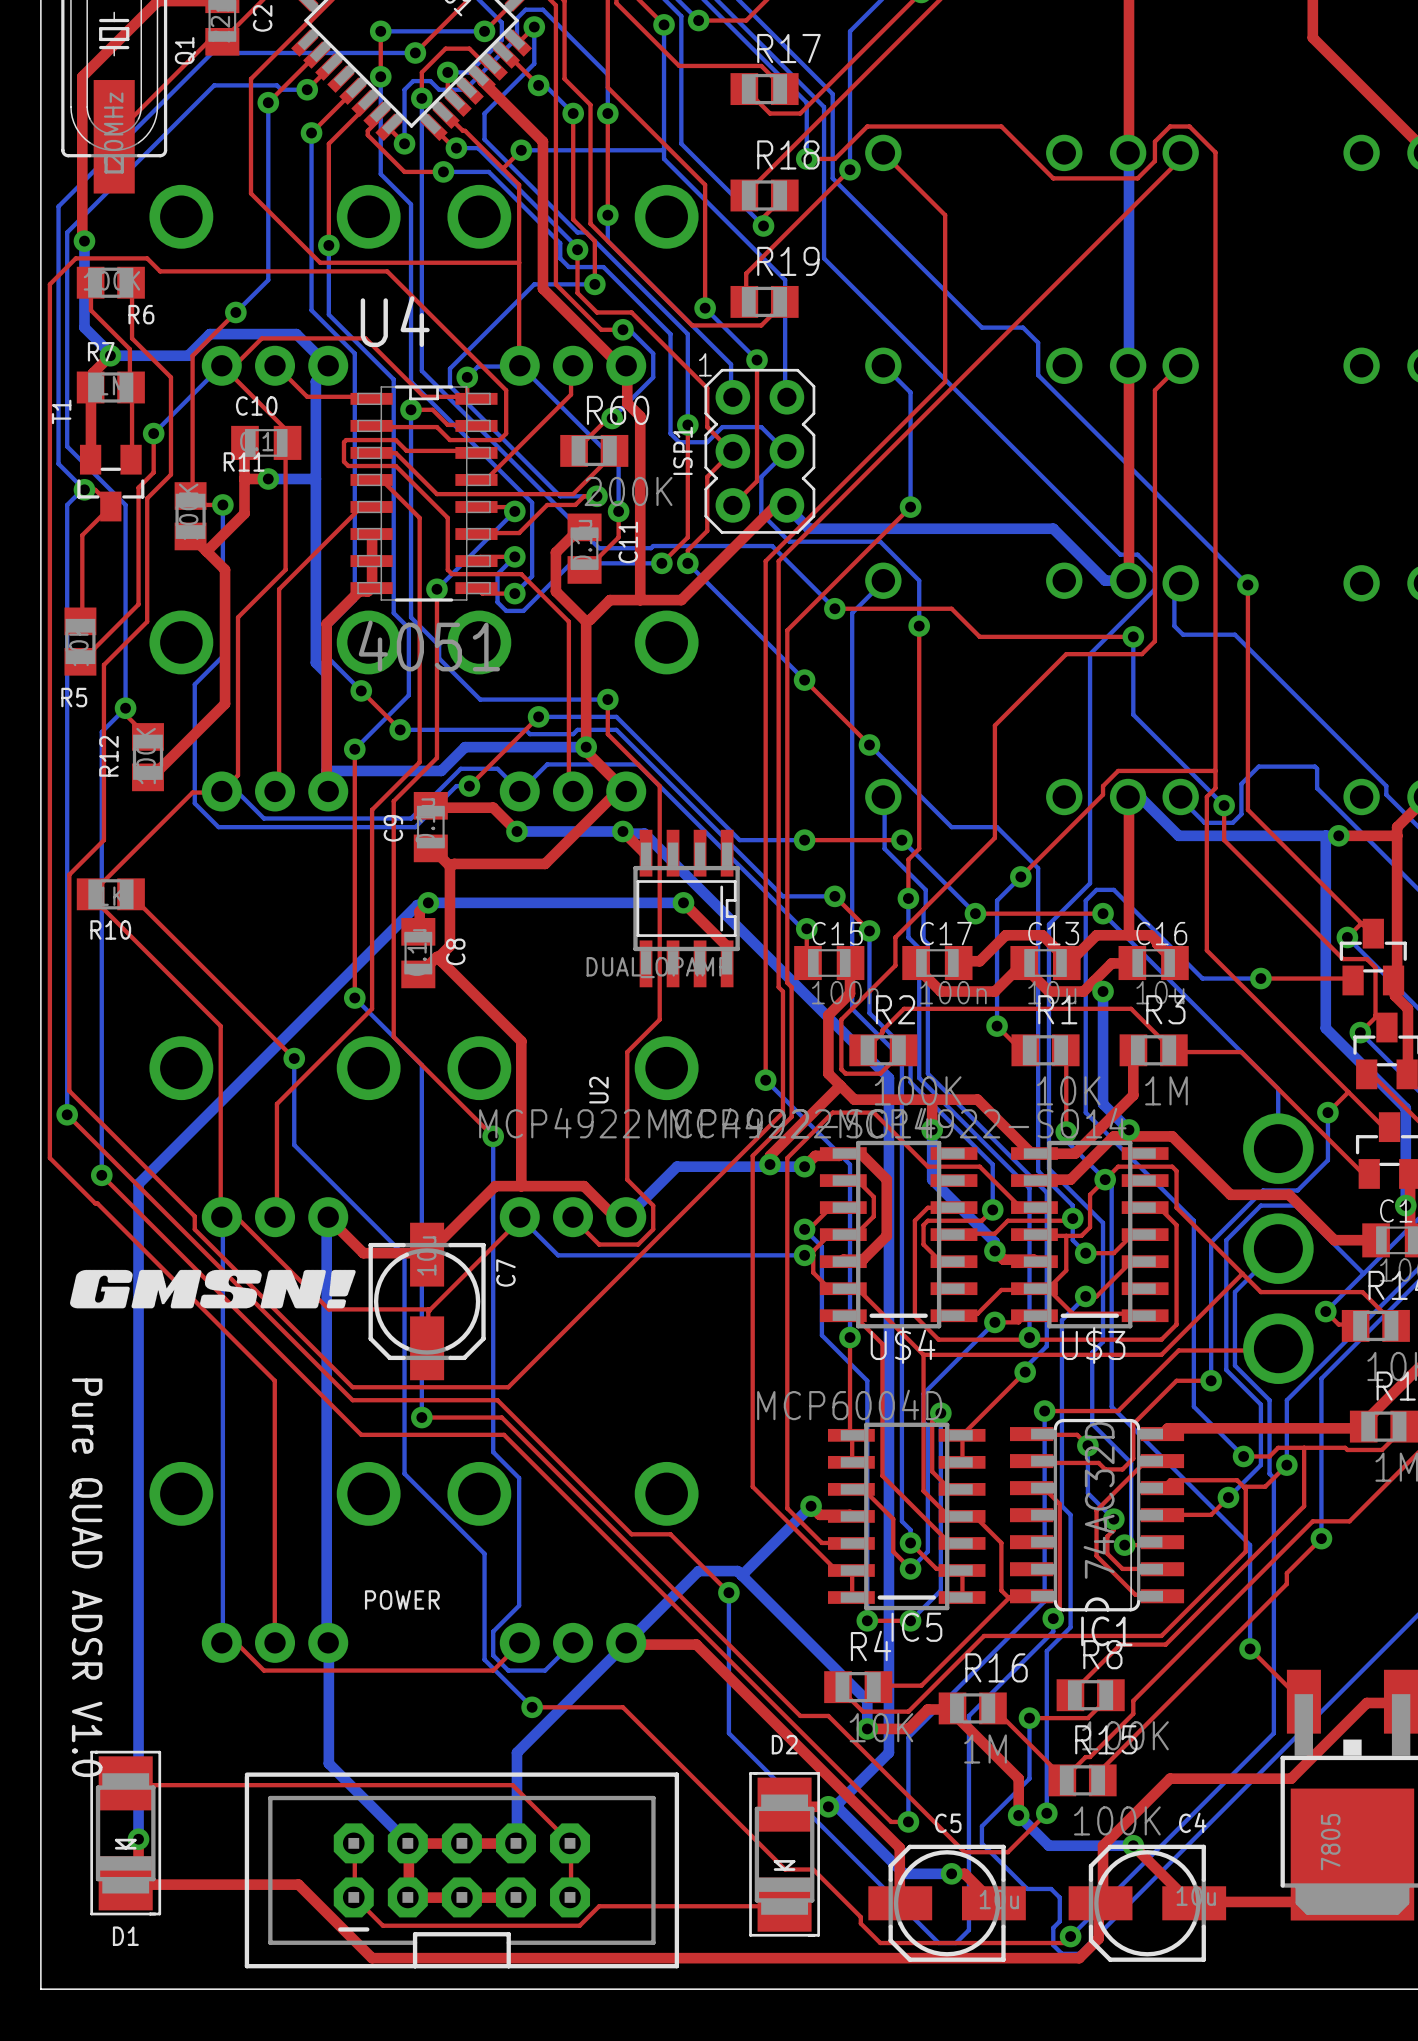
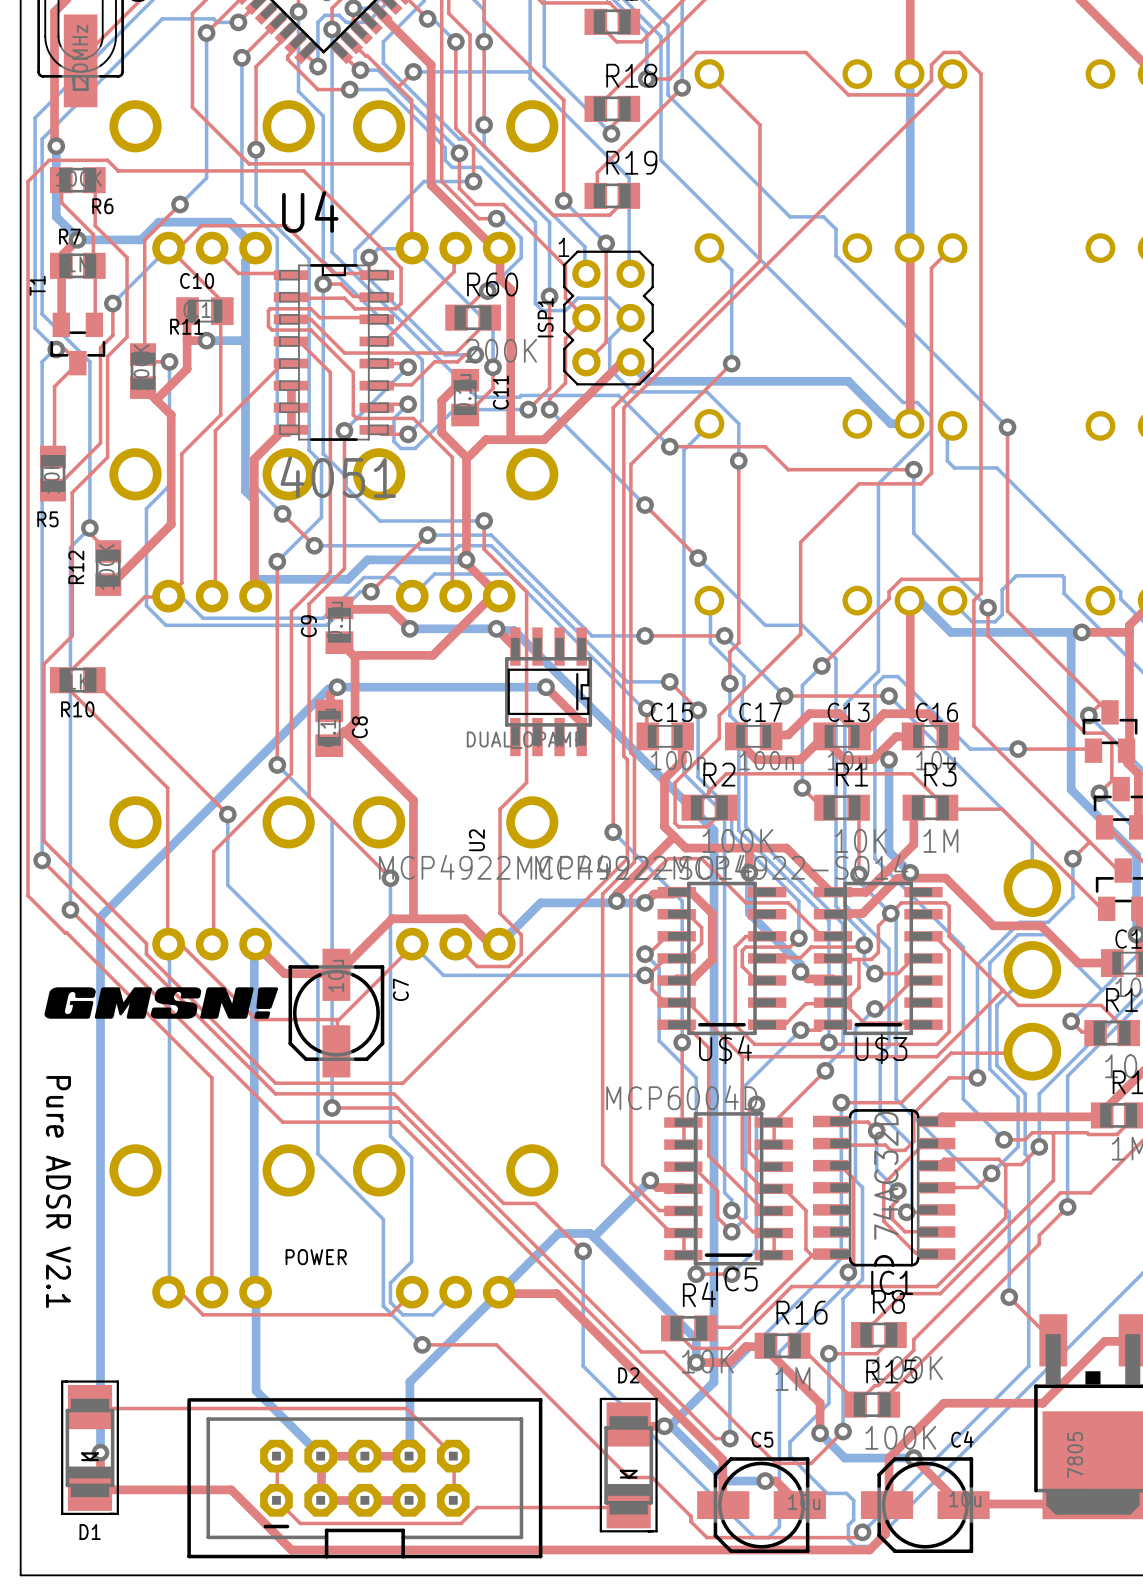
text: Pure QUAD ADSR V1.0 (85, 1577) -> Pure ADSR V2.1 (58, 1192)

